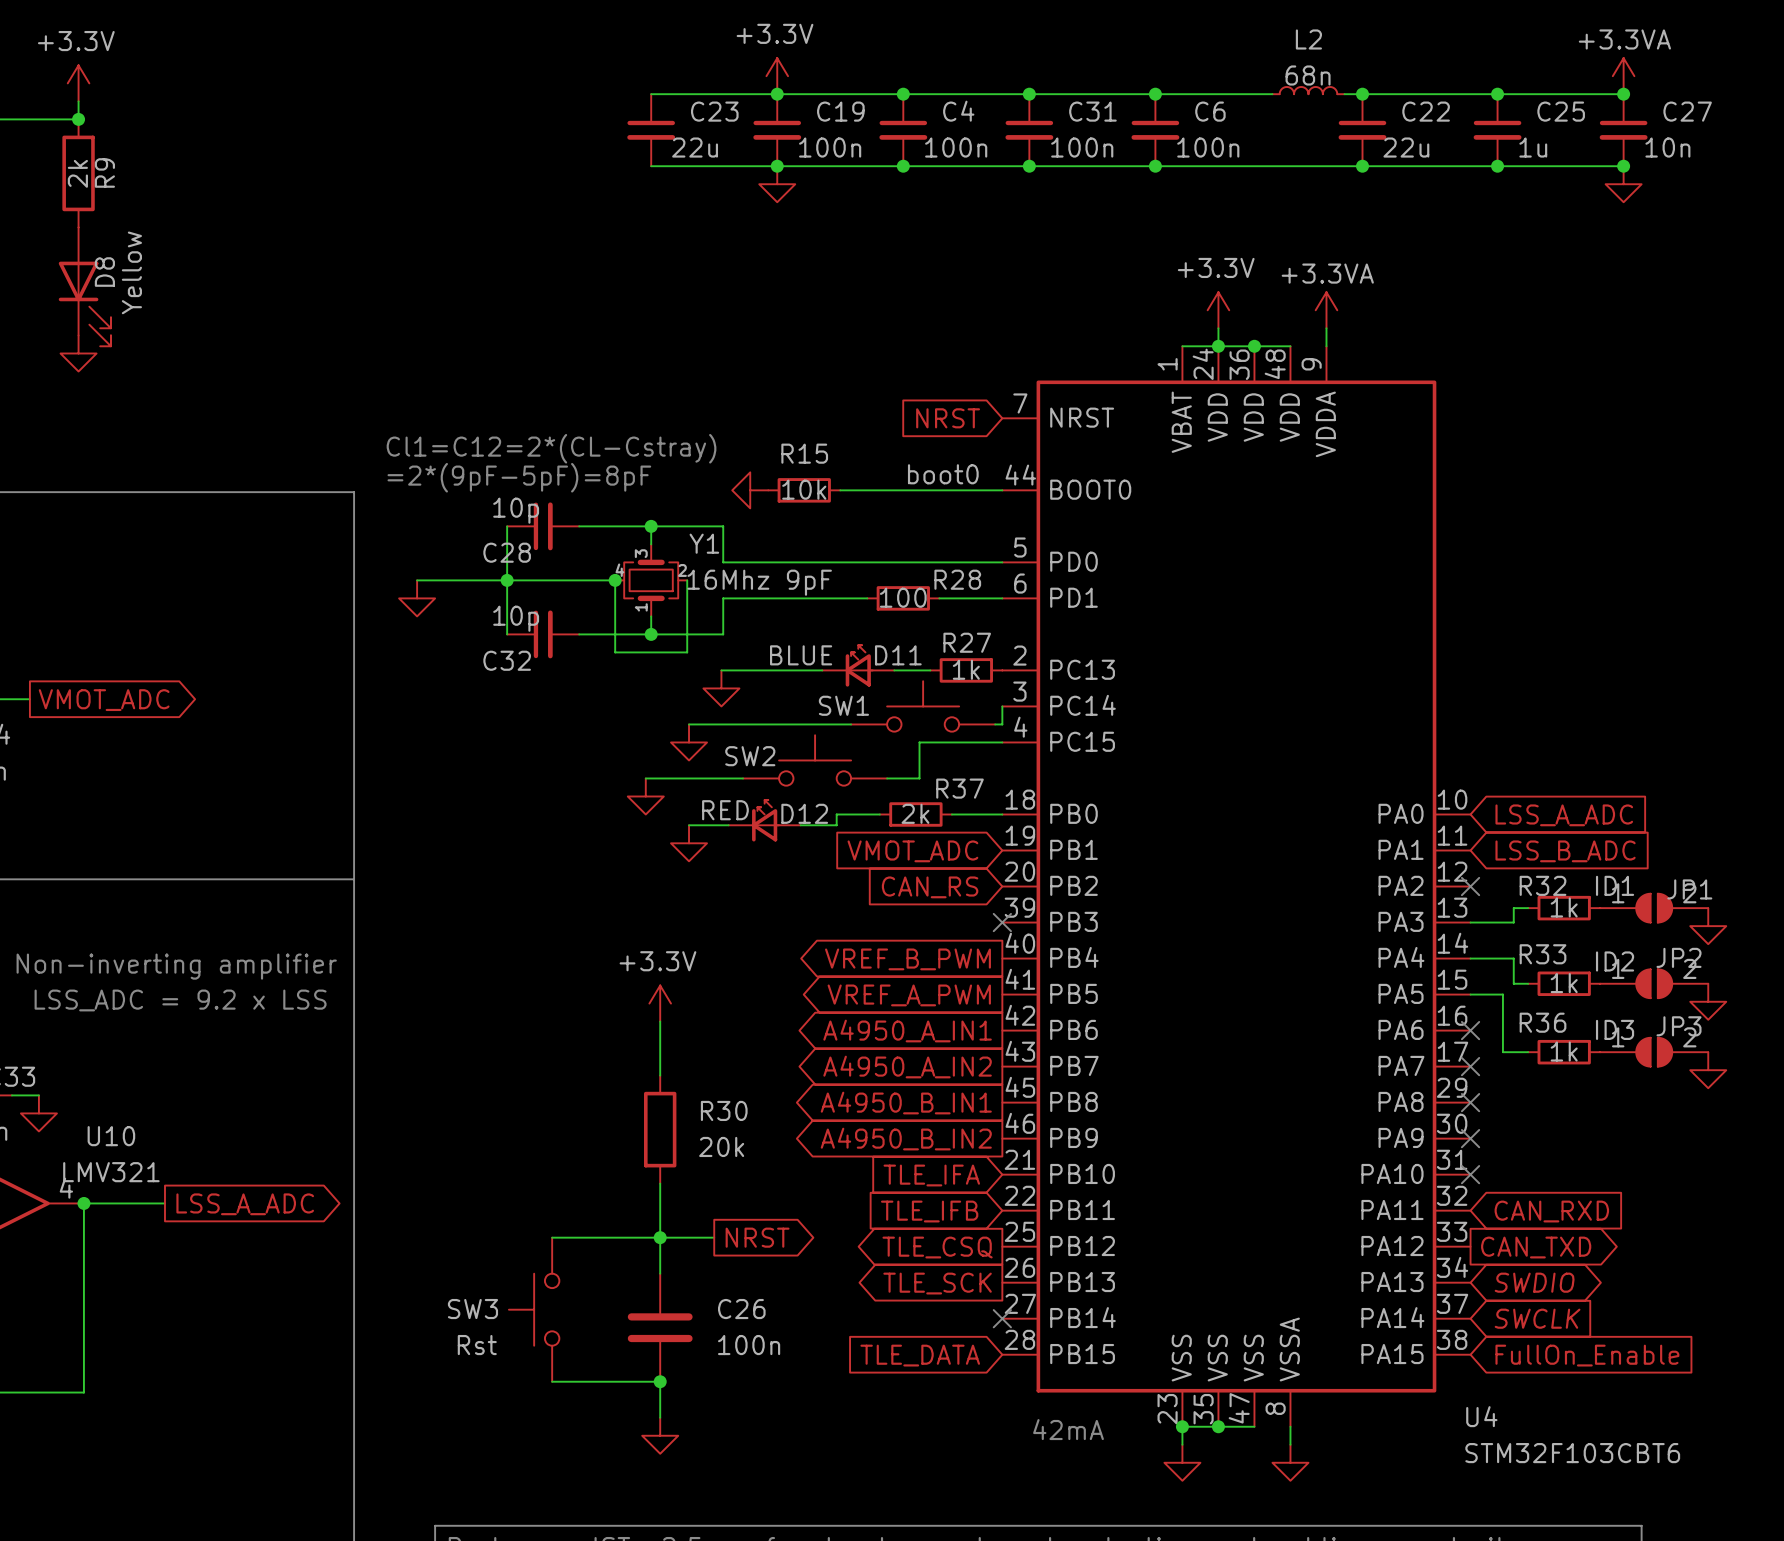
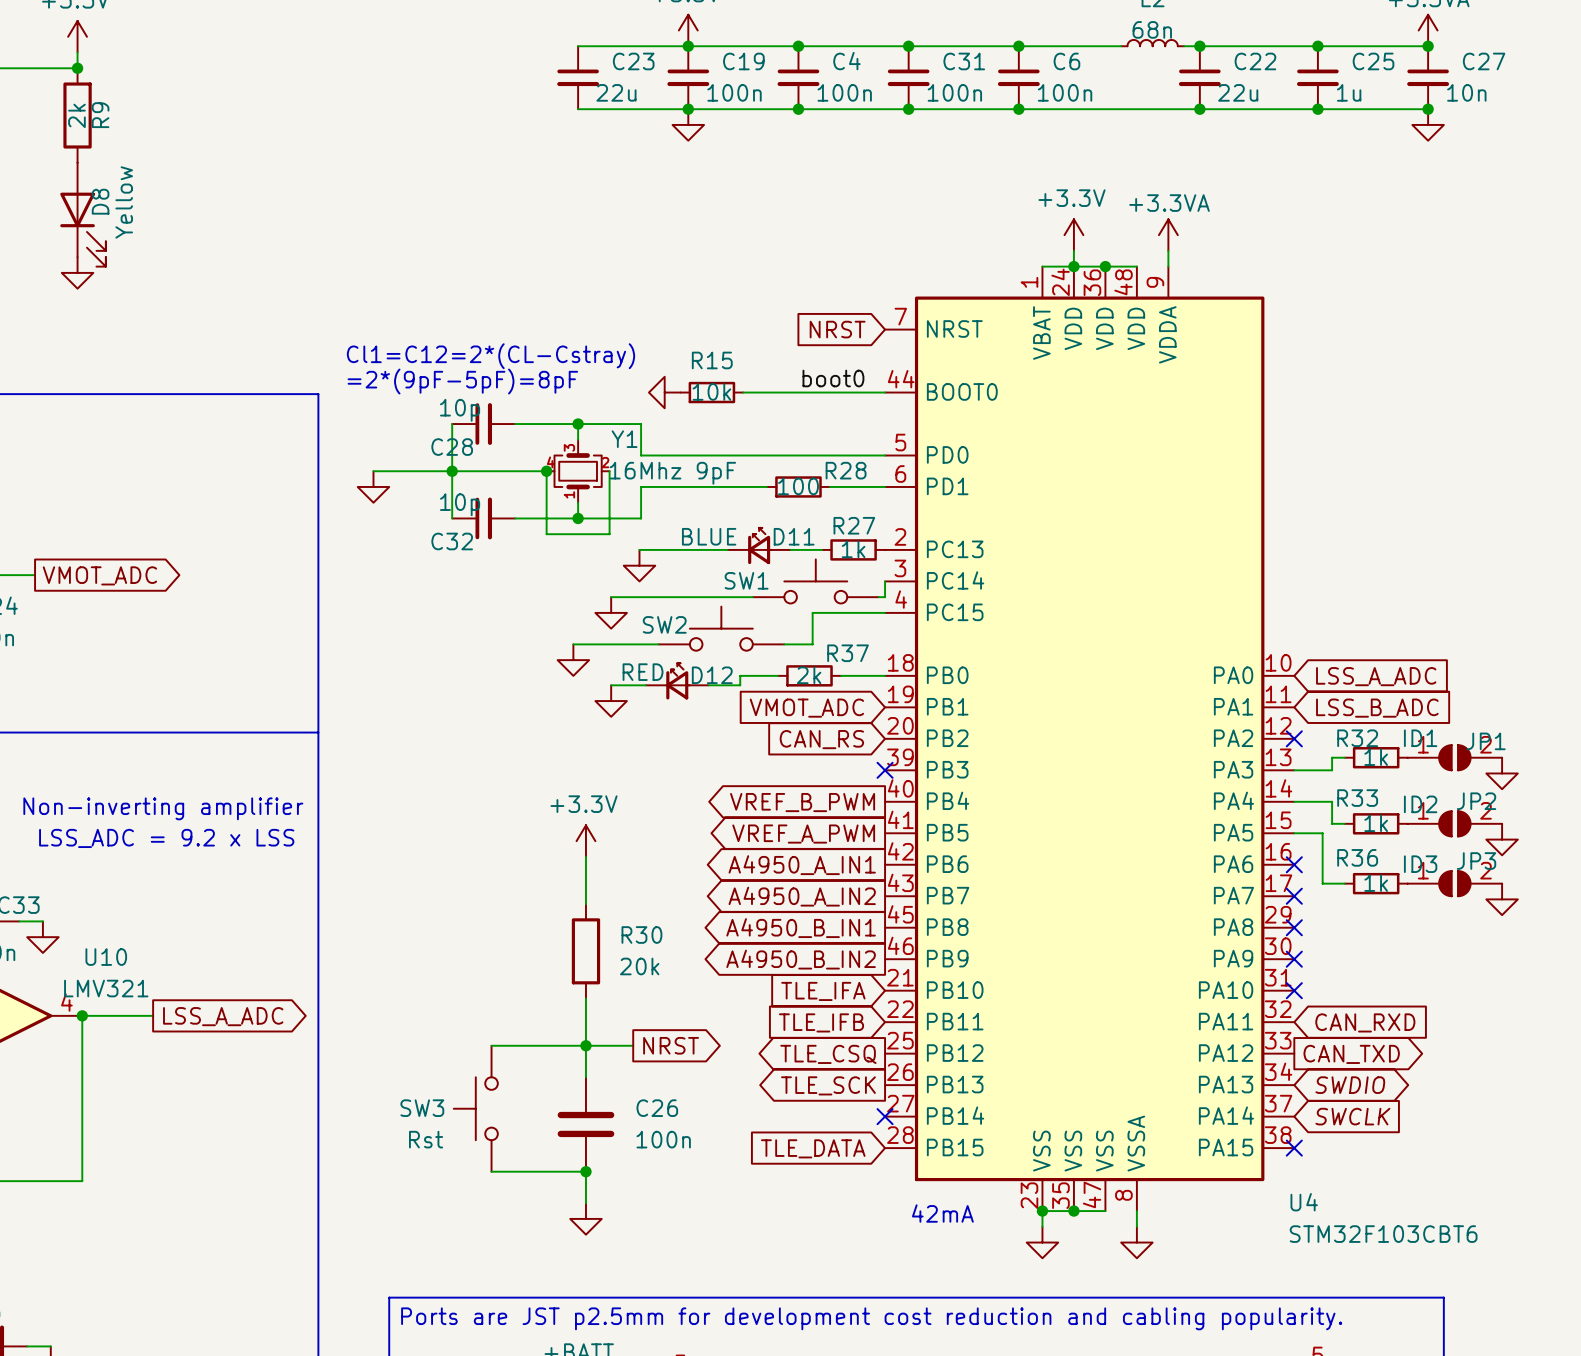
no-connect mark: none -> (1294, 1148)
global label: FullOn_Enable (1587, 1355) -> none

